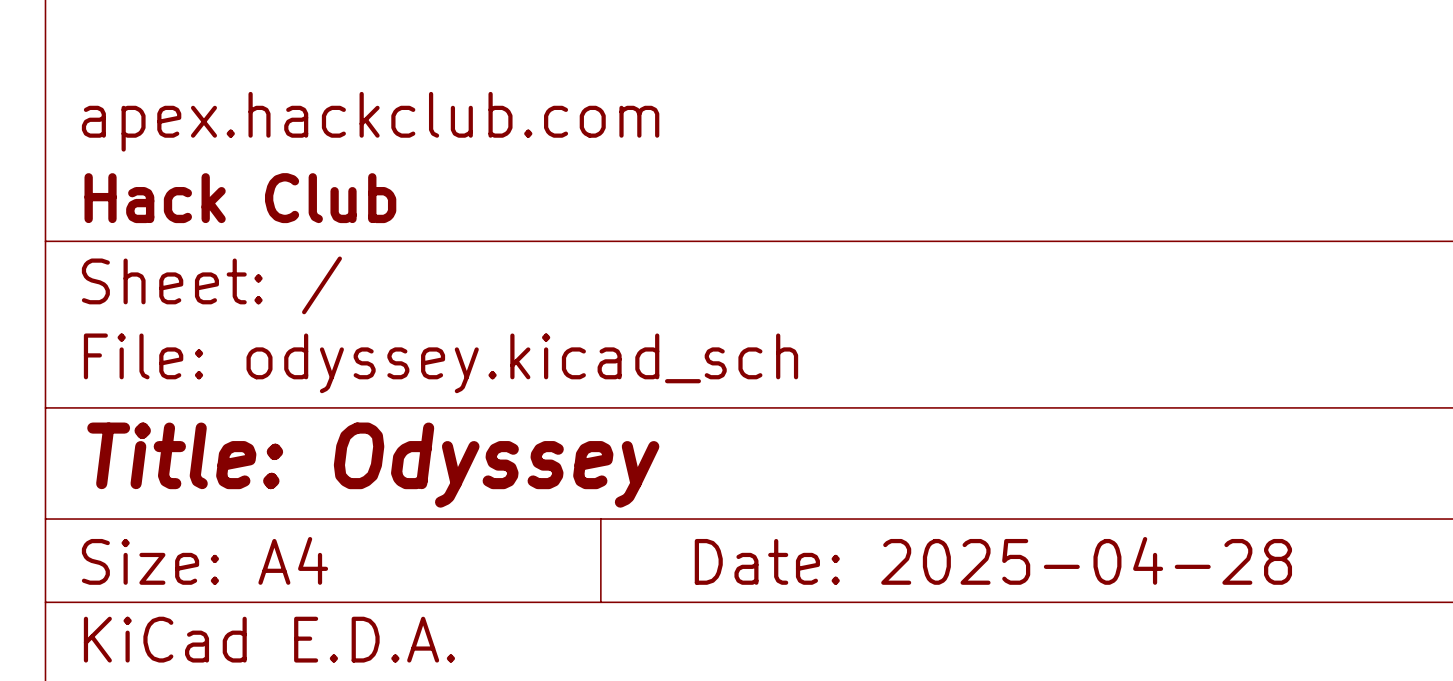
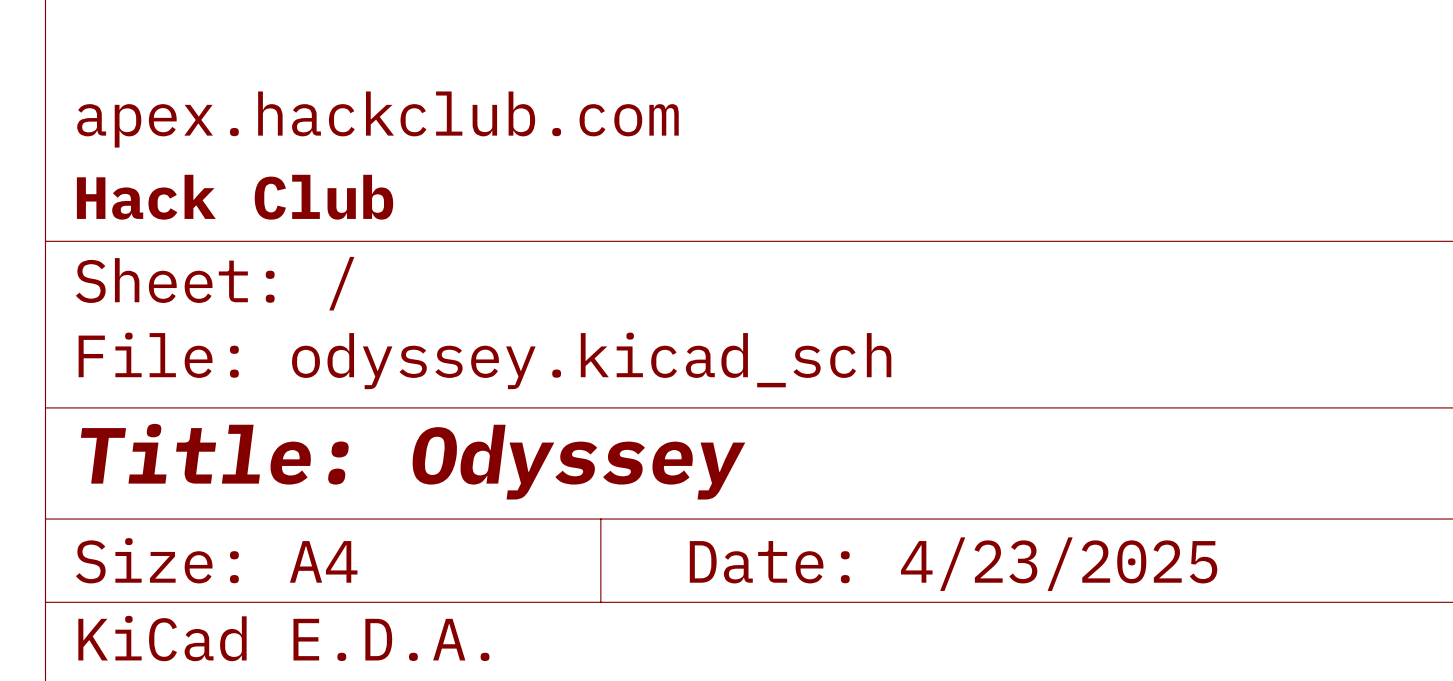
title block: Date: 2025-04-28 (993, 560) -> Date: 4/23/2025 (953, 564)

